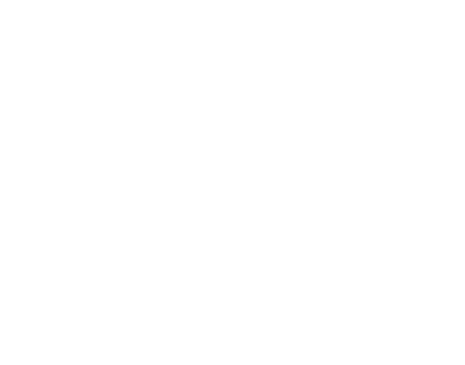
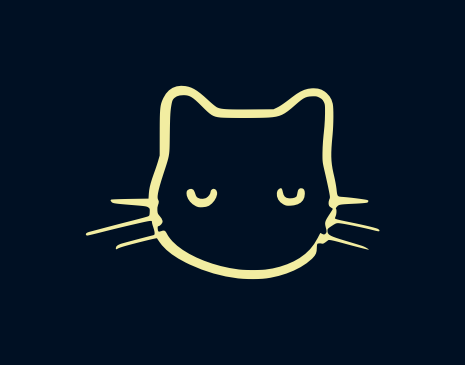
drawing: none -> [85, 85, 380, 280]

